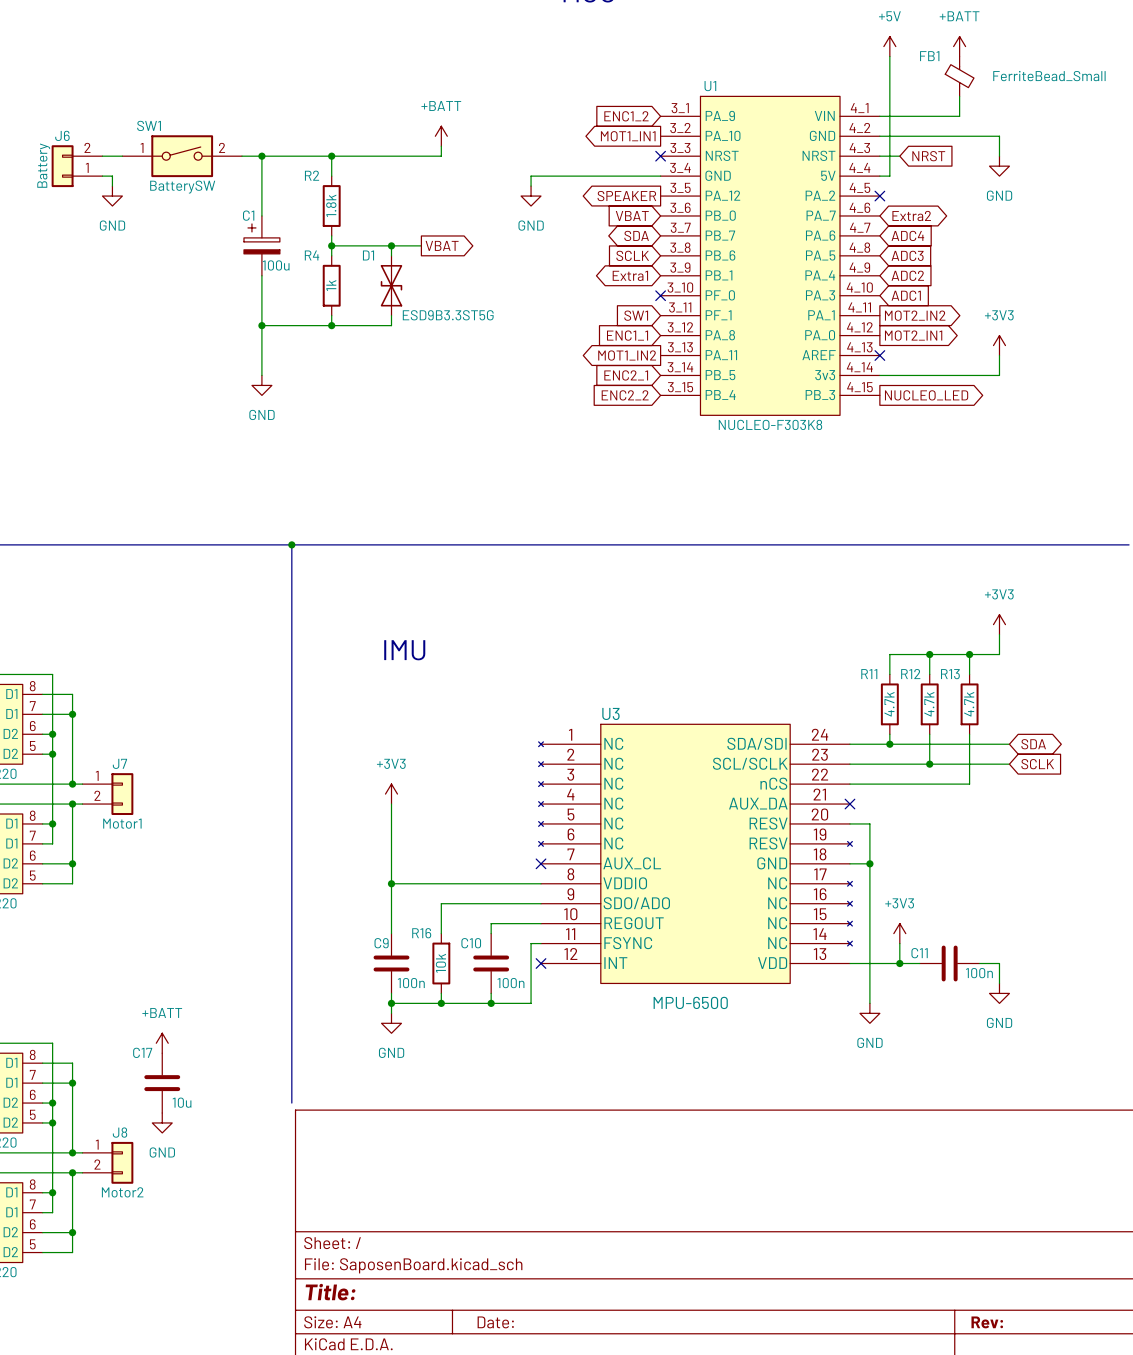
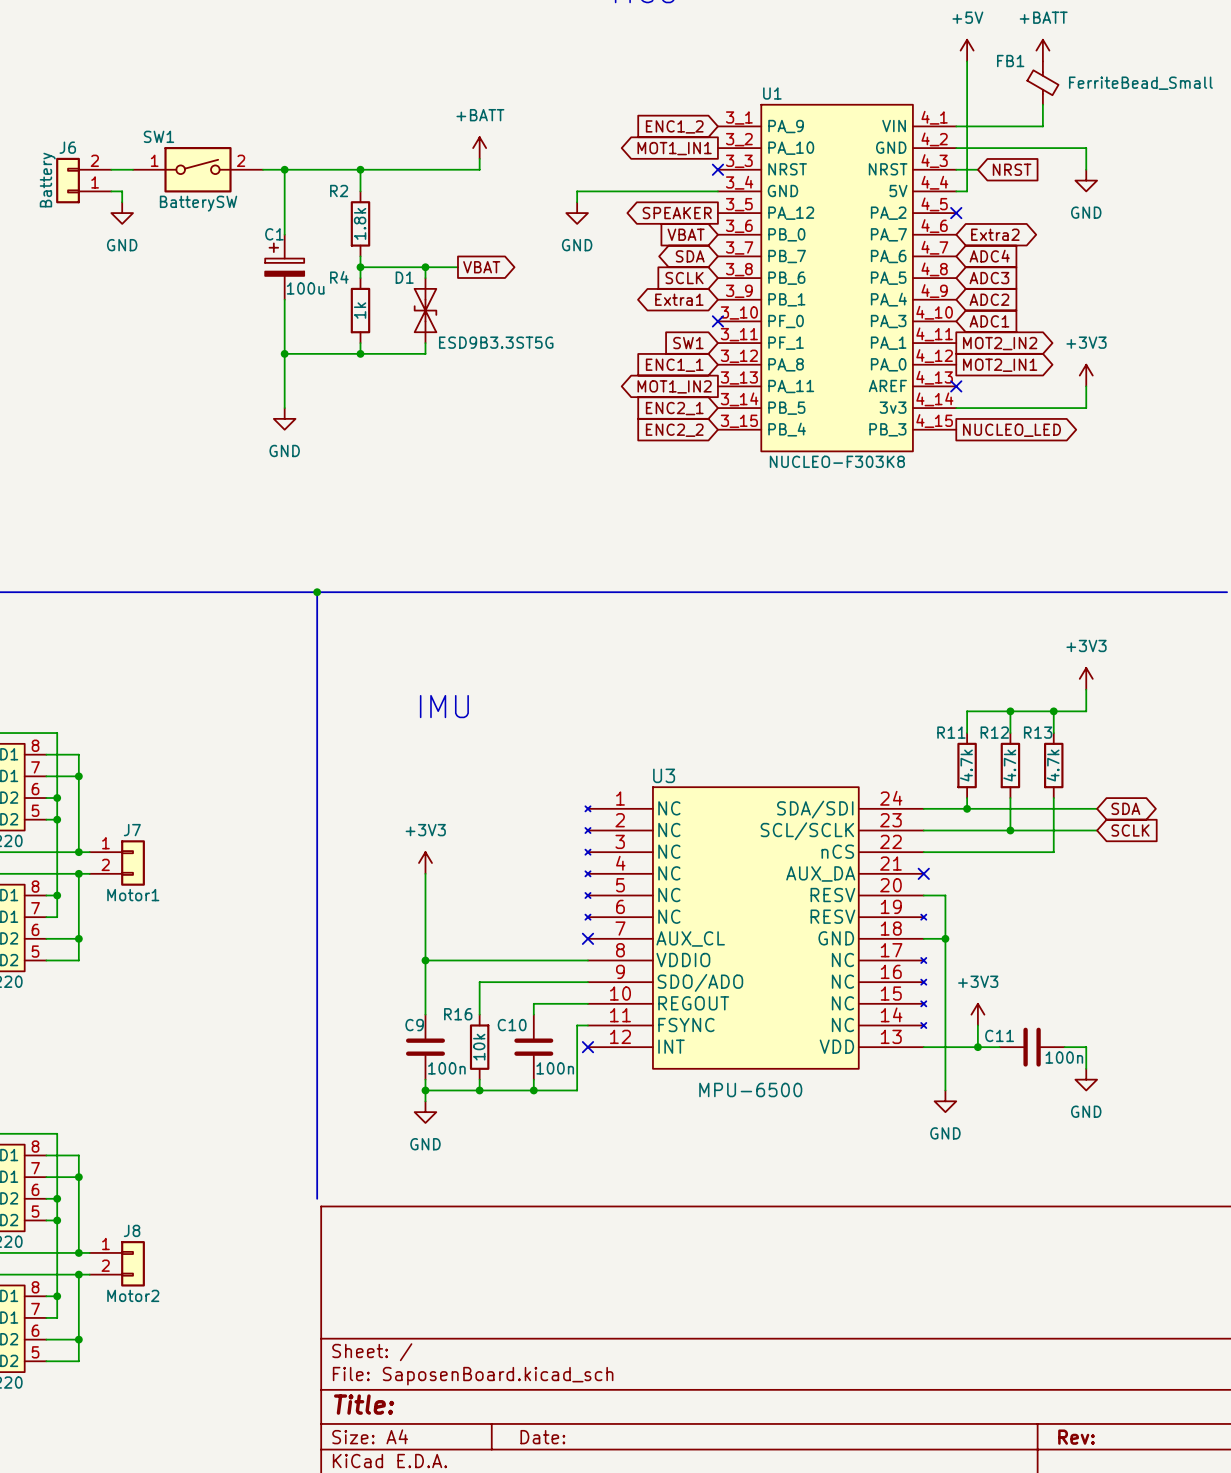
power symbol: +BATT (162, 1043) -> none
C17: 10u (162, 1083) -> none
power symbol: GND (162, 1122) -> none

